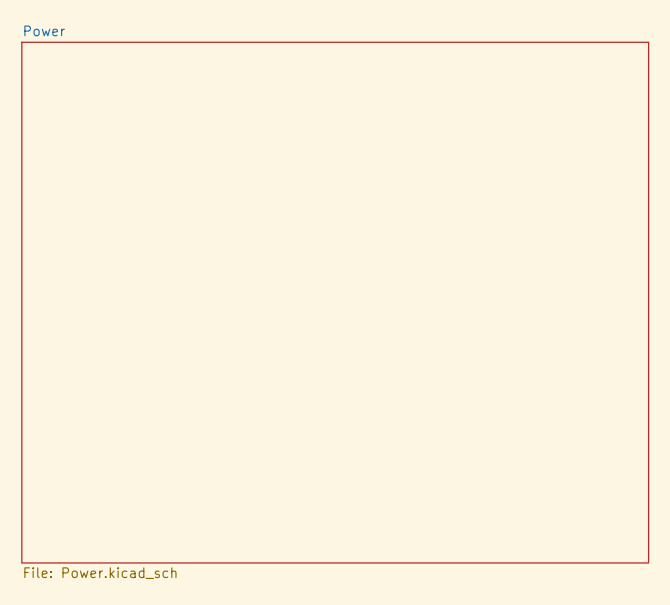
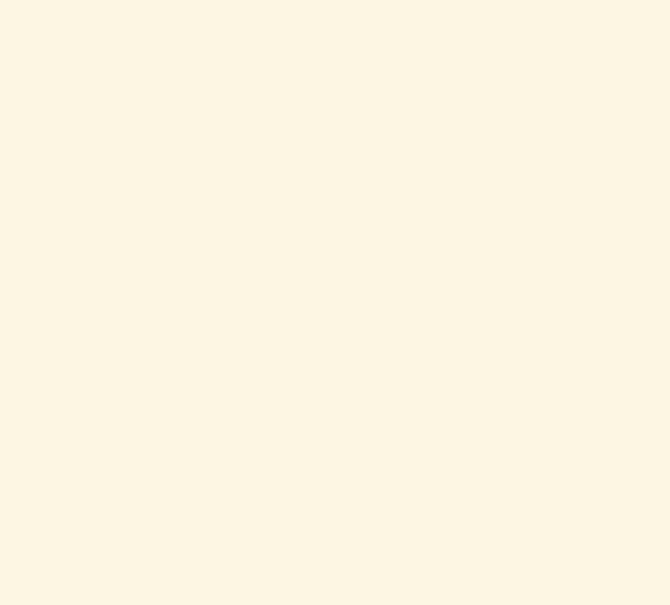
sheet Power: File: Power.kicad_sch (335, 302) -> none

